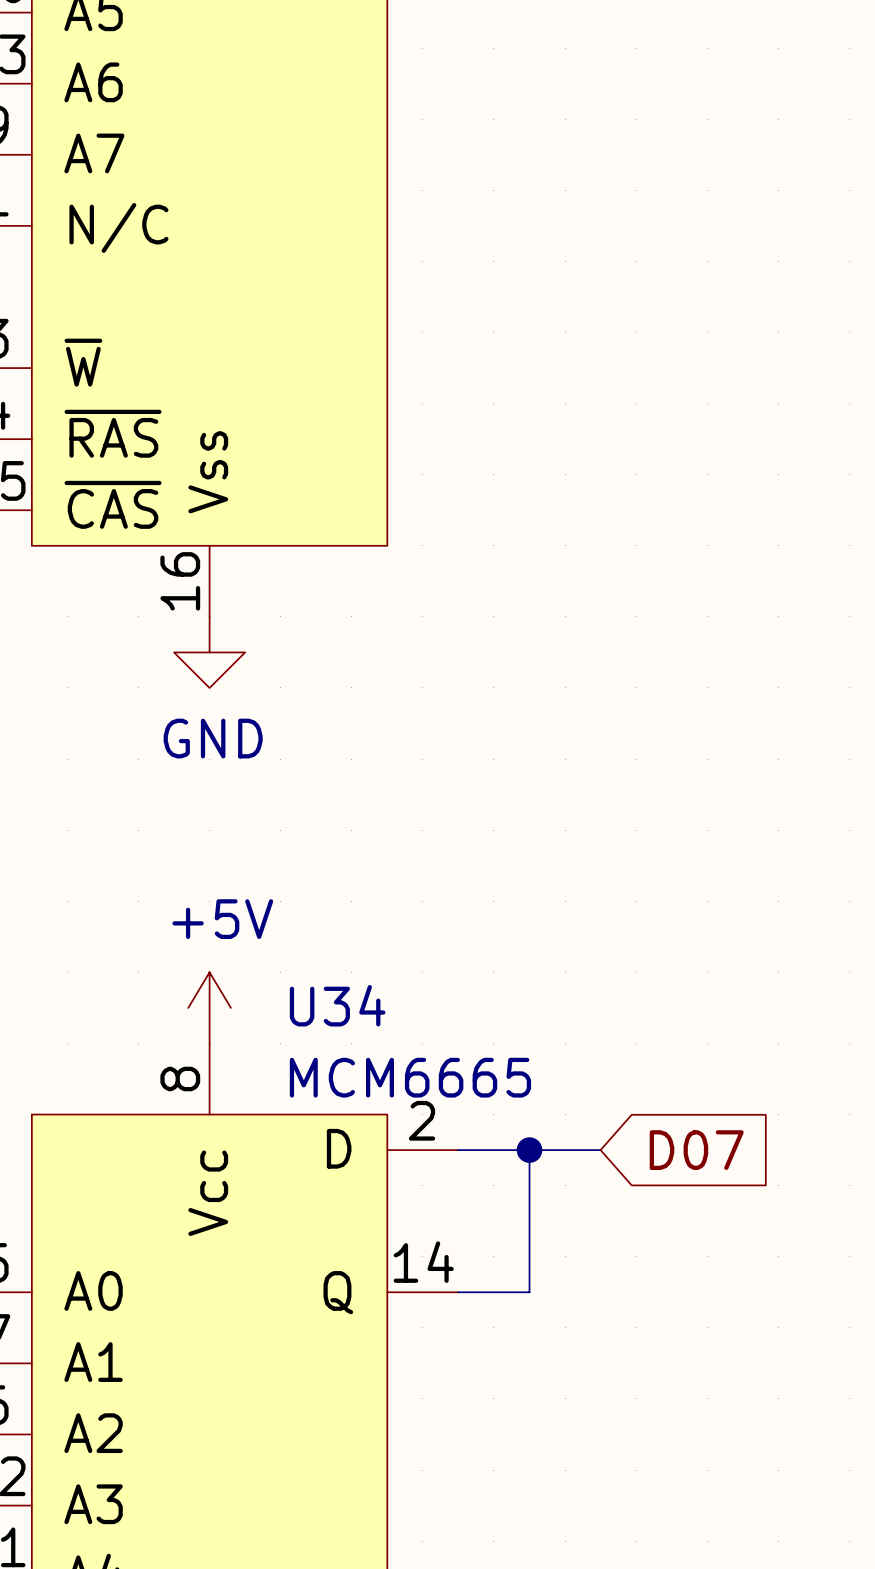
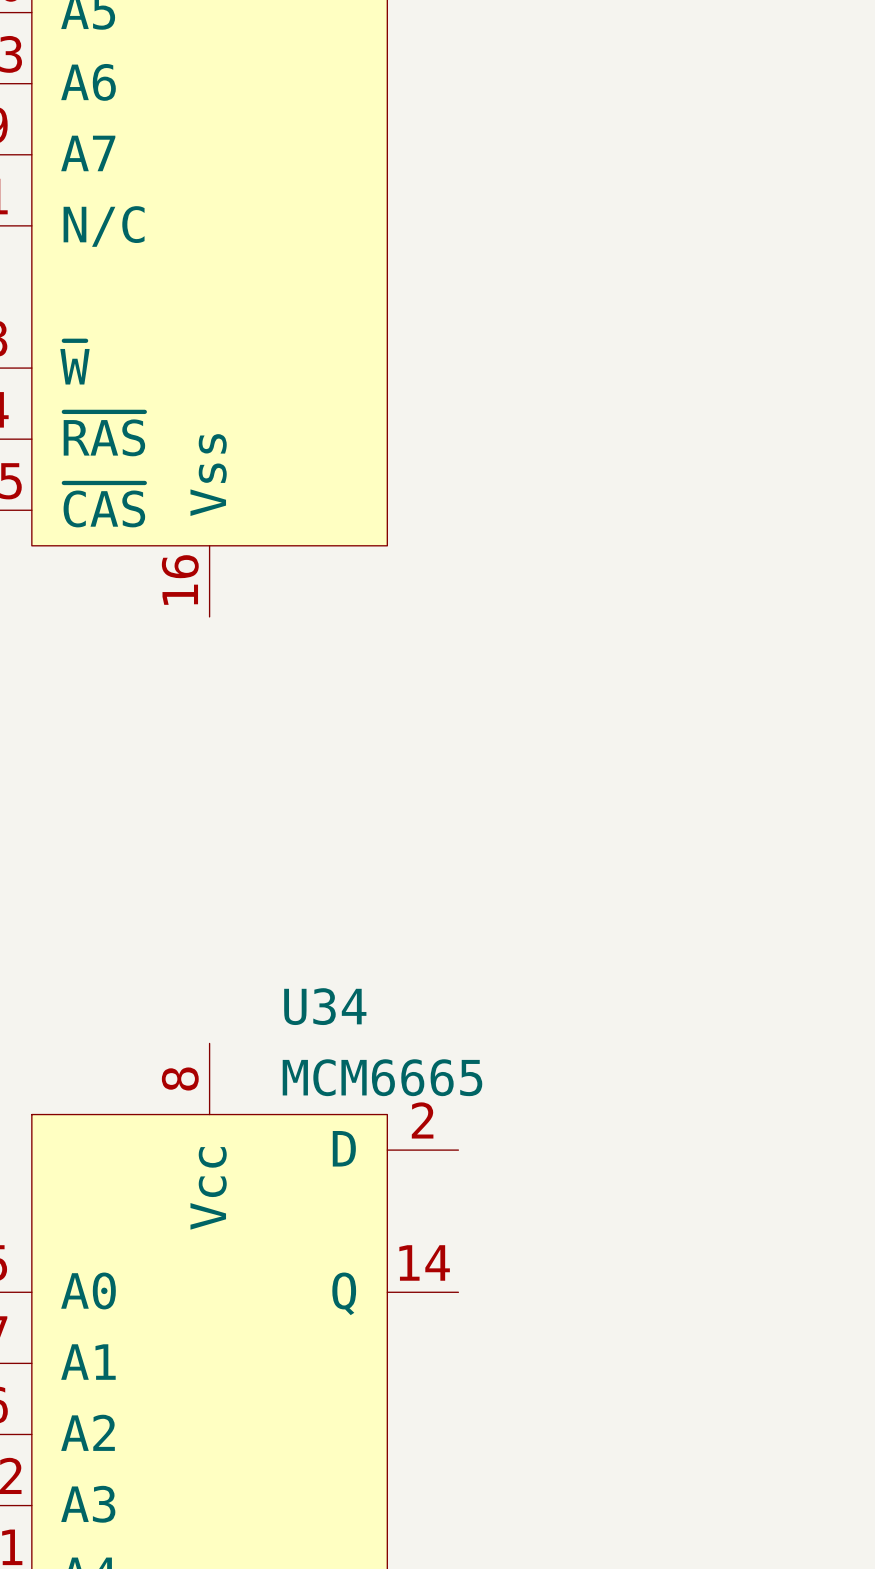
power symbol: GND (209, 652) -> none
power symbol: +5V (209, 1007) -> none
wire: (458, 1150) (600, 1150) -> none
wire: (529, 1150) (529, 1292) (458, 1292) -> none
junction: (529, 1150) -> none
global label: D07 (696, 1150) -> none

